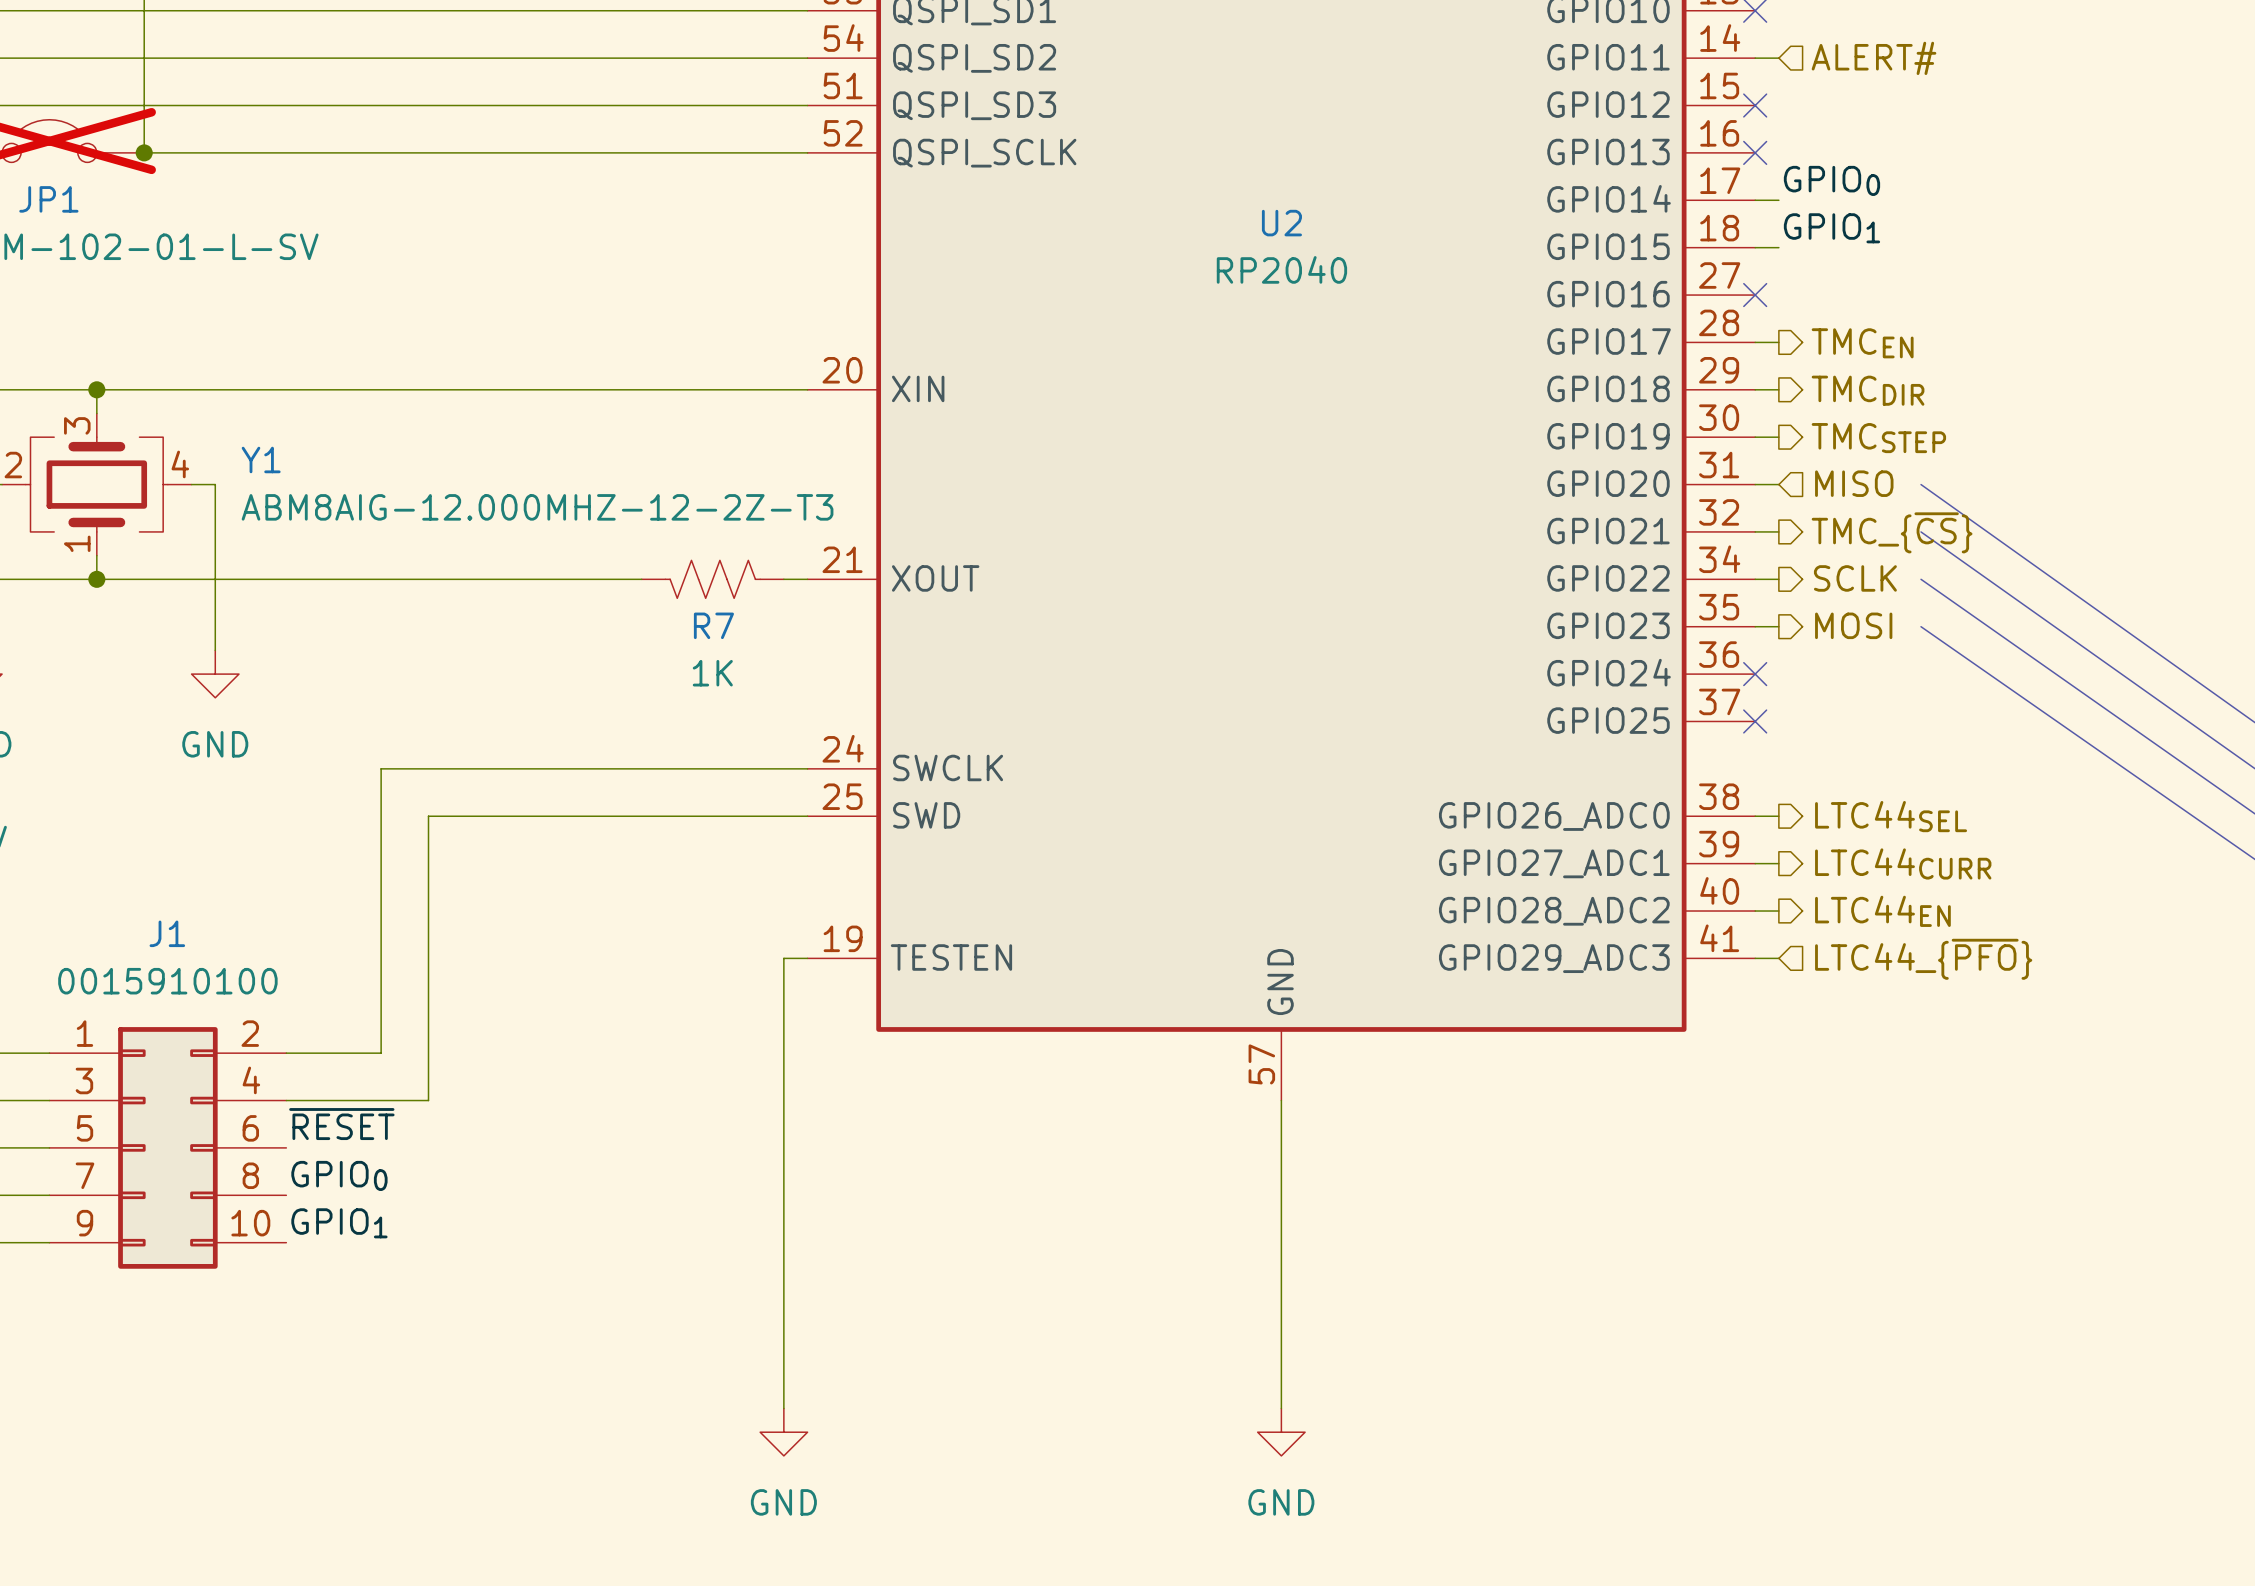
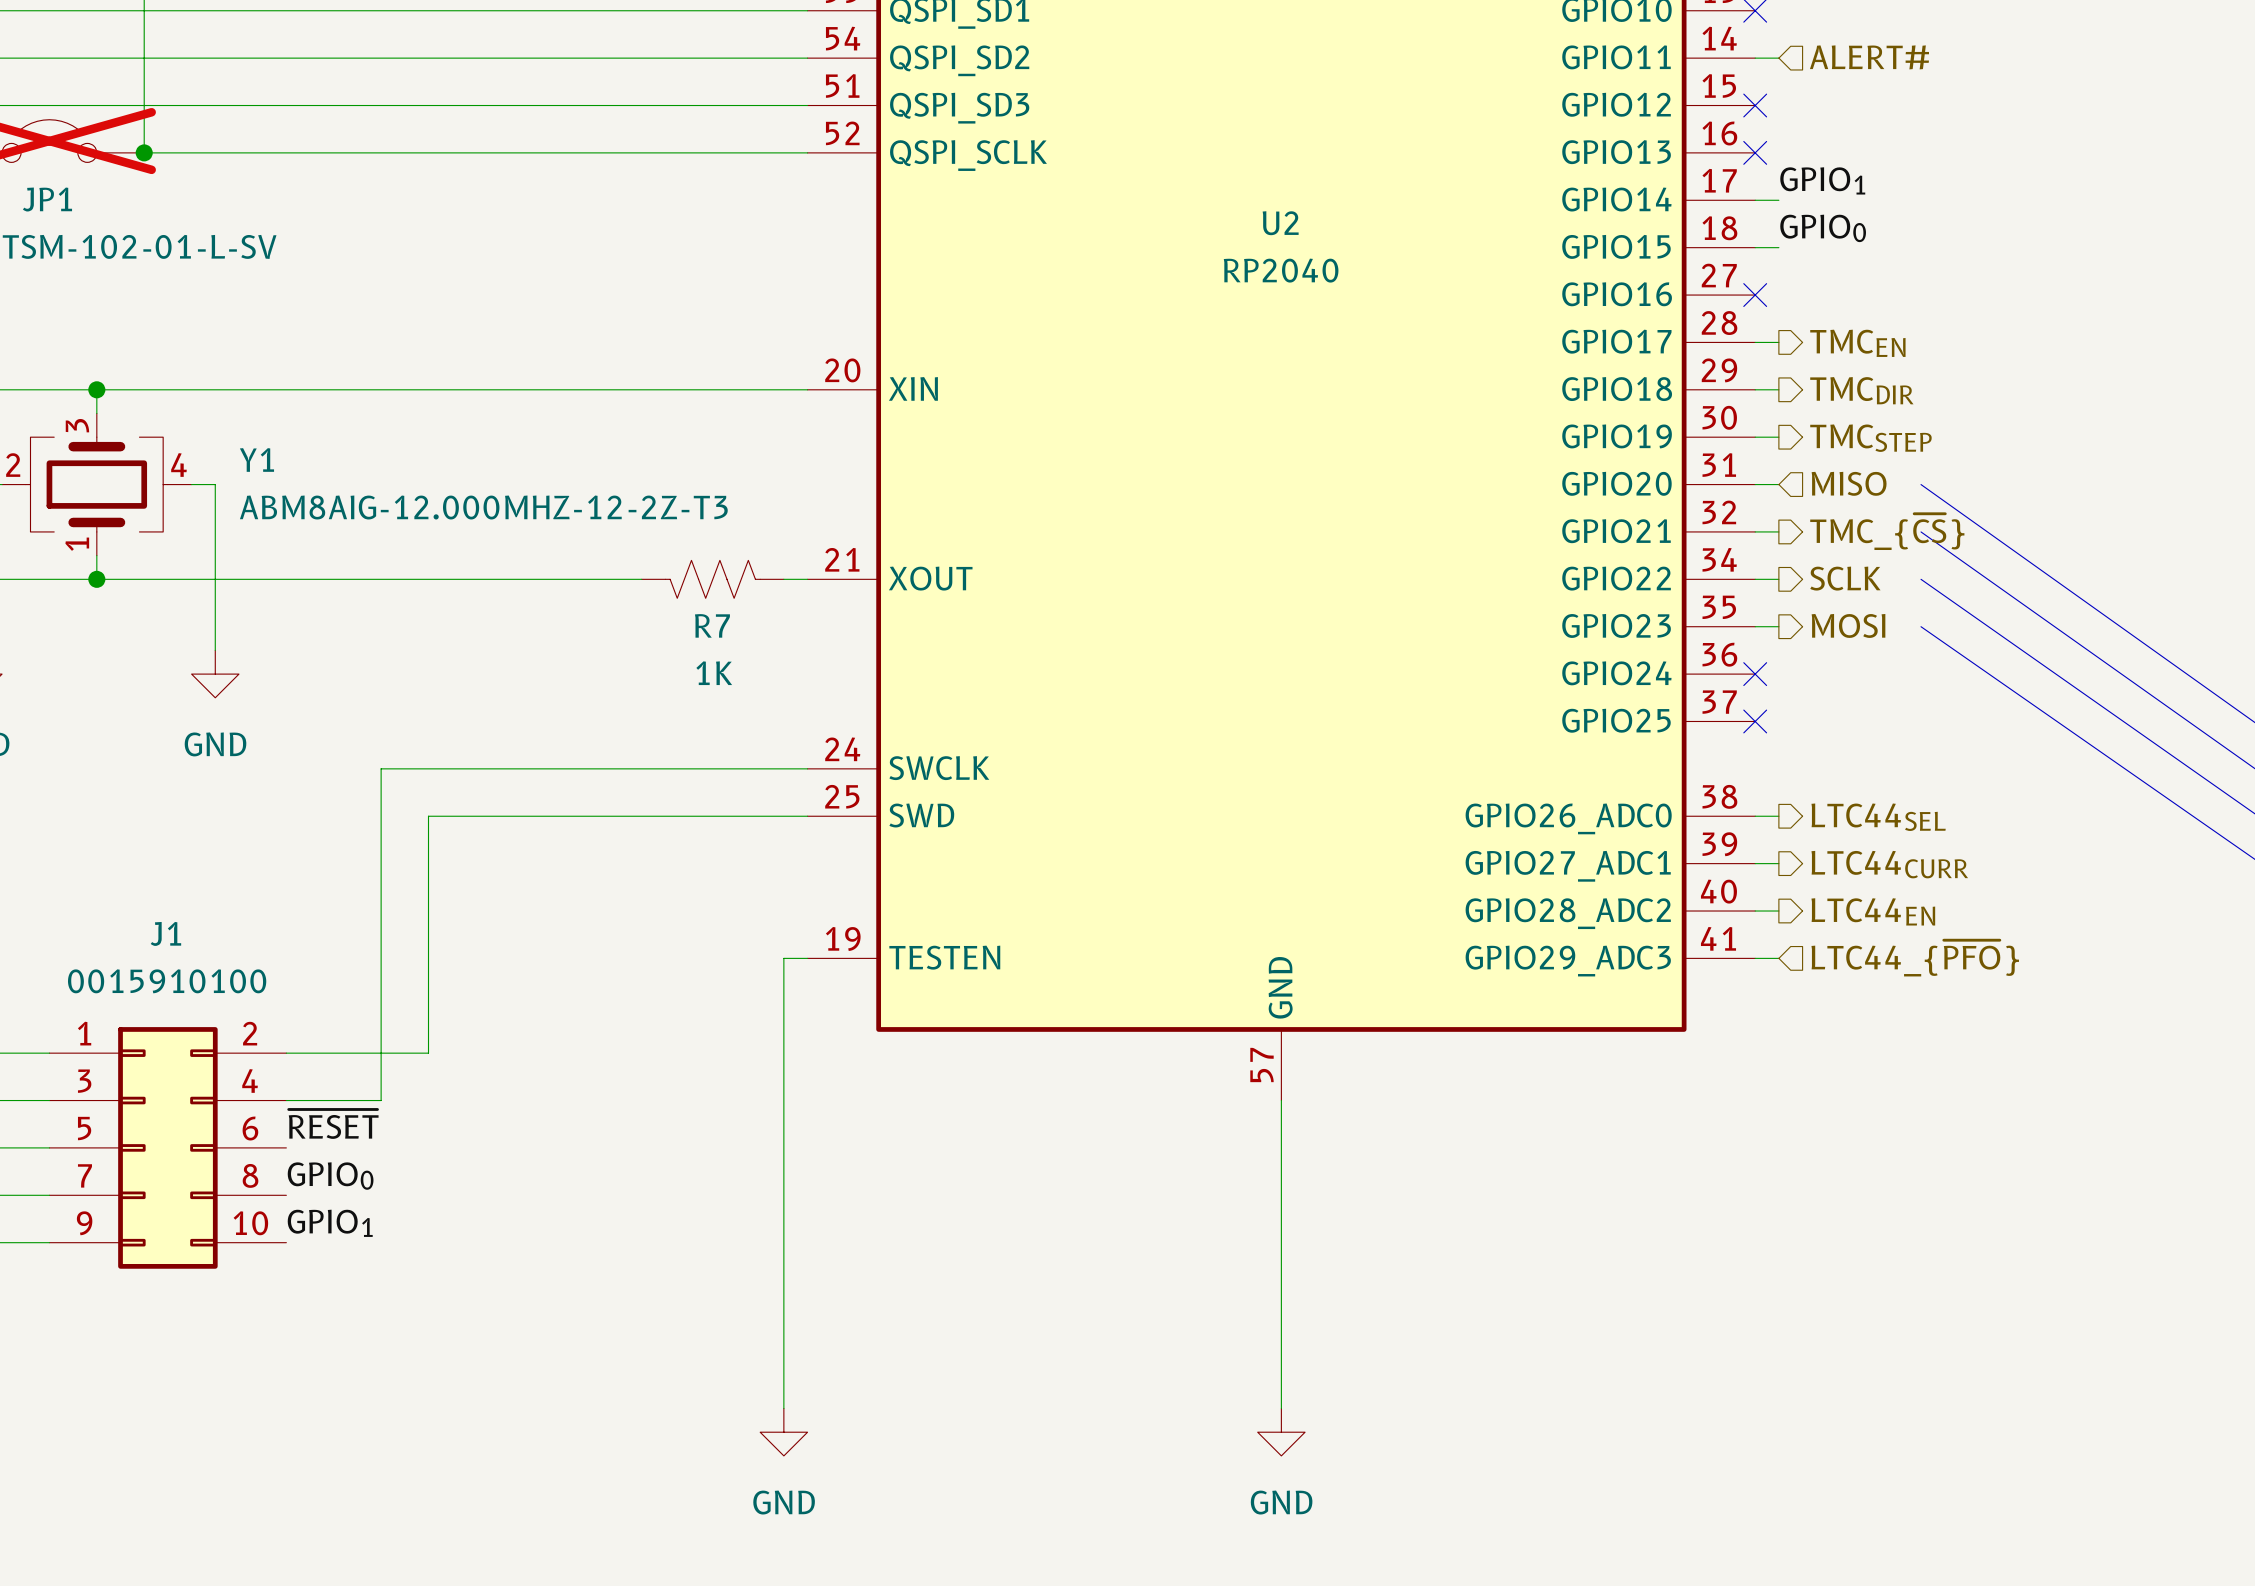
label: GPIO0 (1831, 180) -> GPIO1 (1822, 180)
label: GPIO1 (1831, 228) -> GPIO0 (1823, 228)
wire: (428, 1053) (428, 1100) (381, 1100) -> (428, 1053) (381, 1053) (381, 1100)

